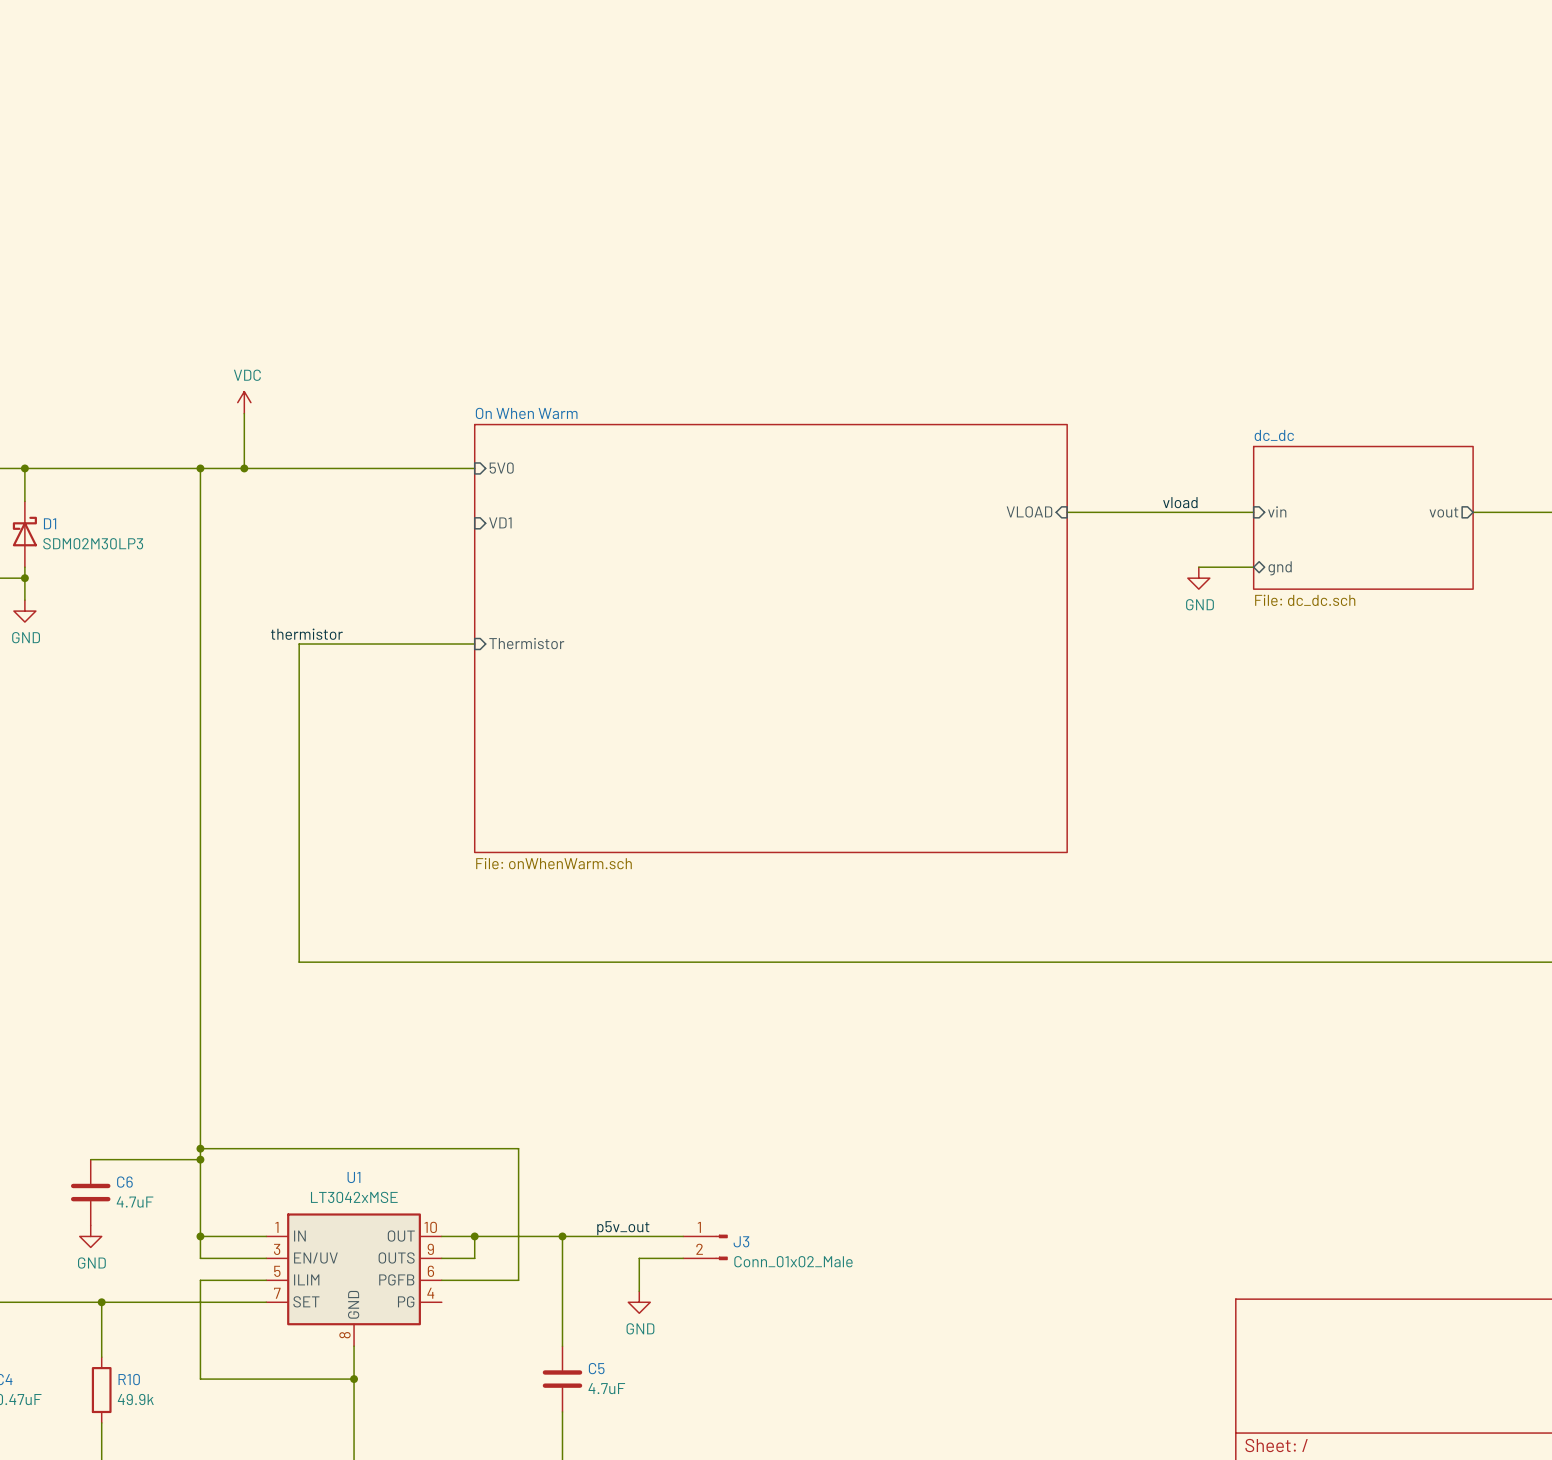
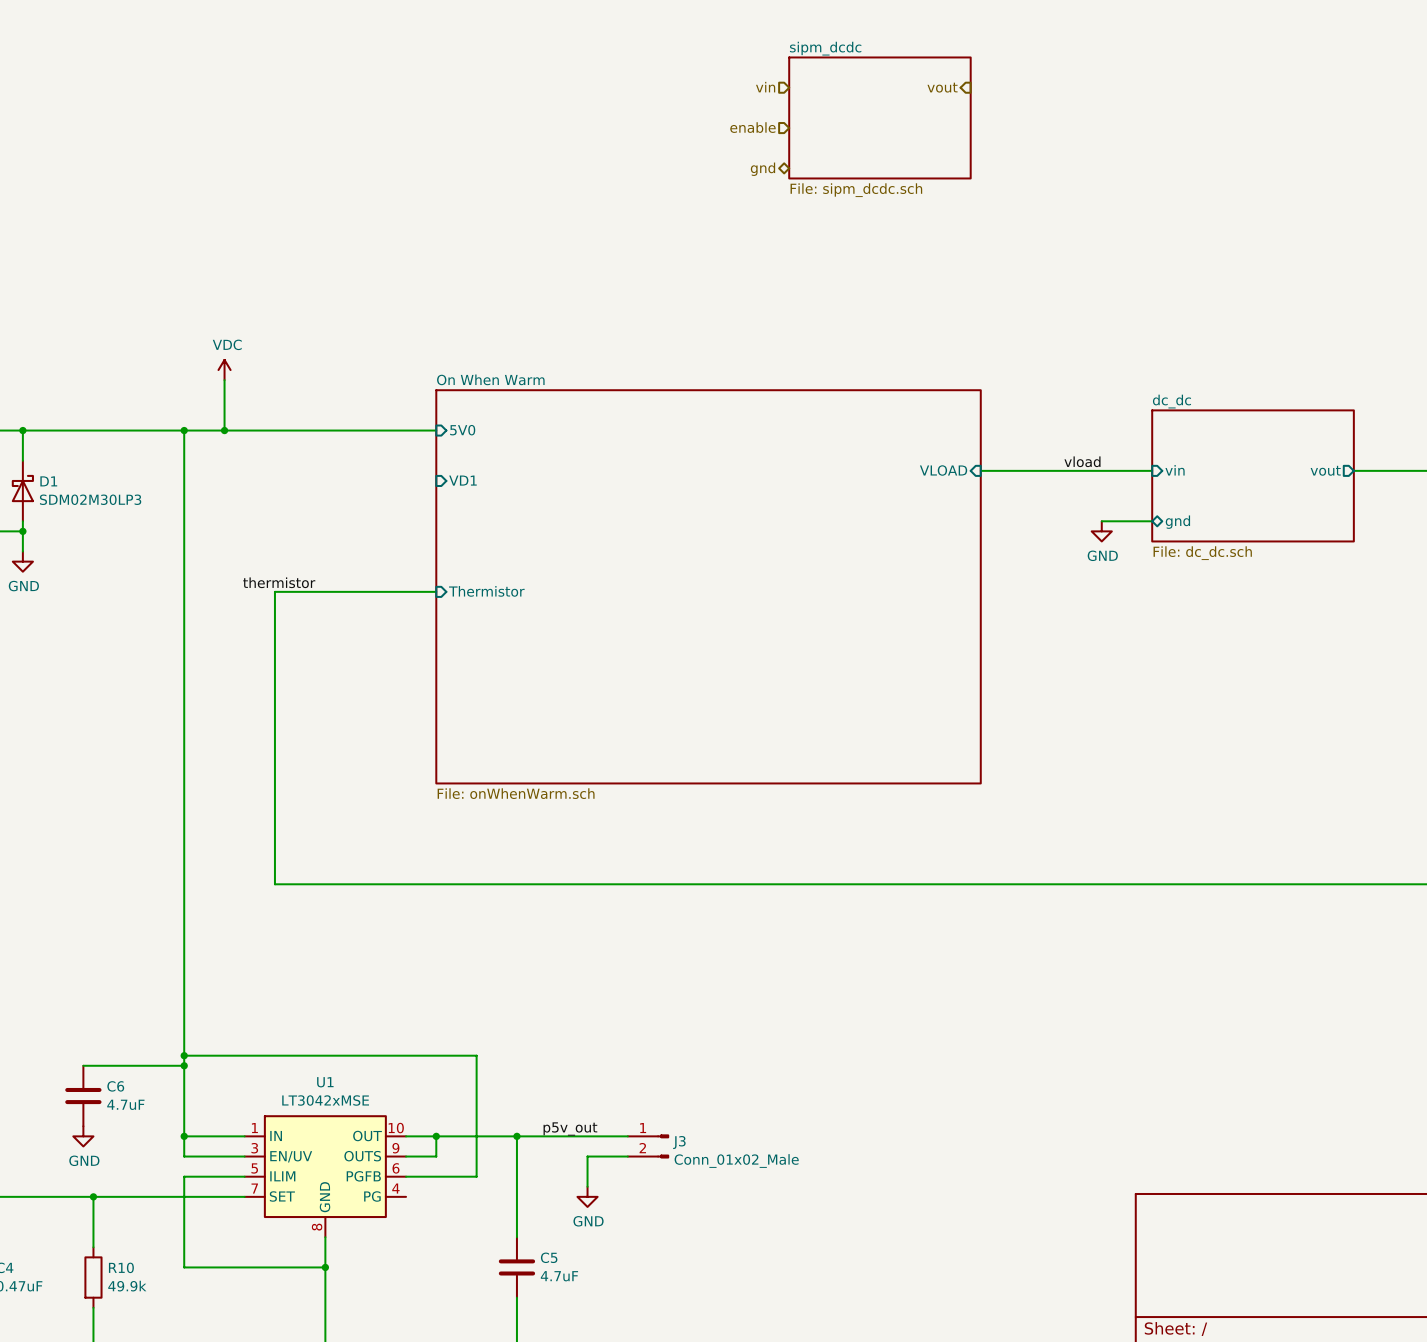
hierarchical label: none -> vin (765, 87)
hierarchical label: none -> vout (942, 87)
sheet sipm_dcdc: none -> File: sipm_dcdc.sch (879, 117)
hierarchical label: none -> enable (752, 127)
hierarchical label: none -> gnd (762, 169)

